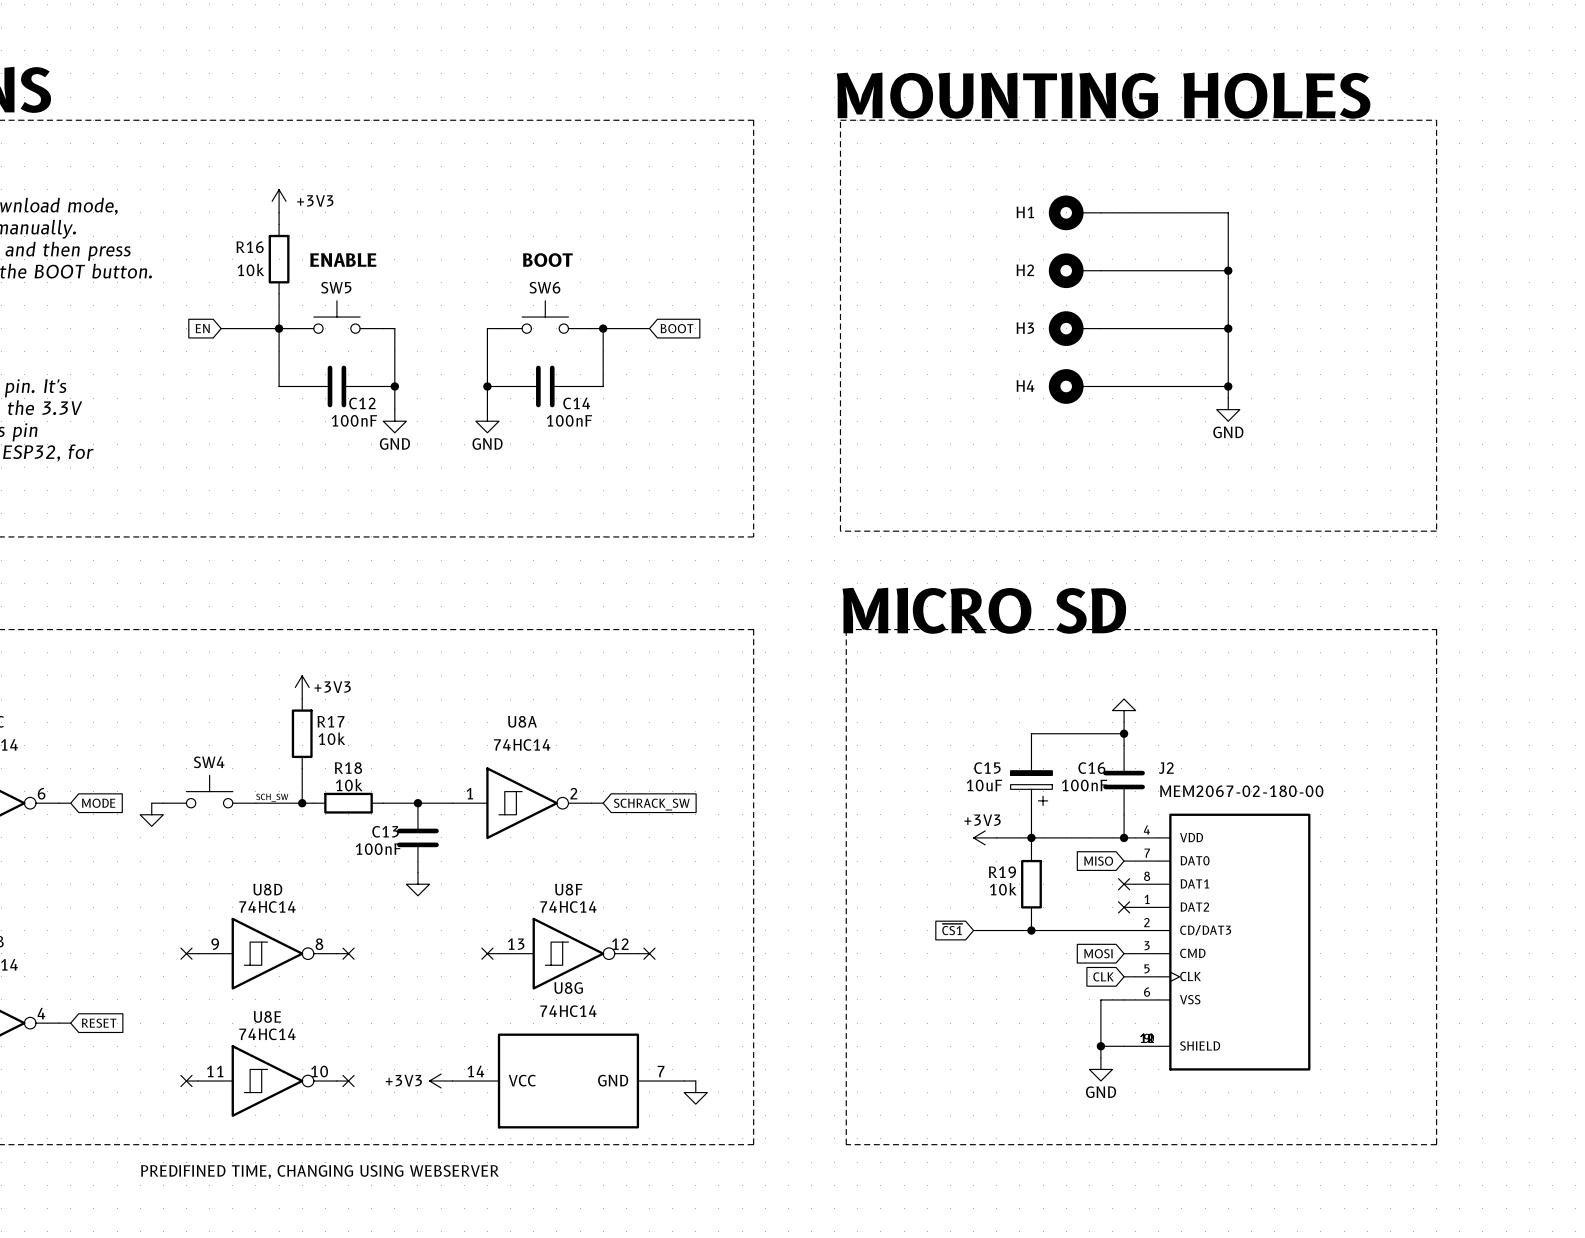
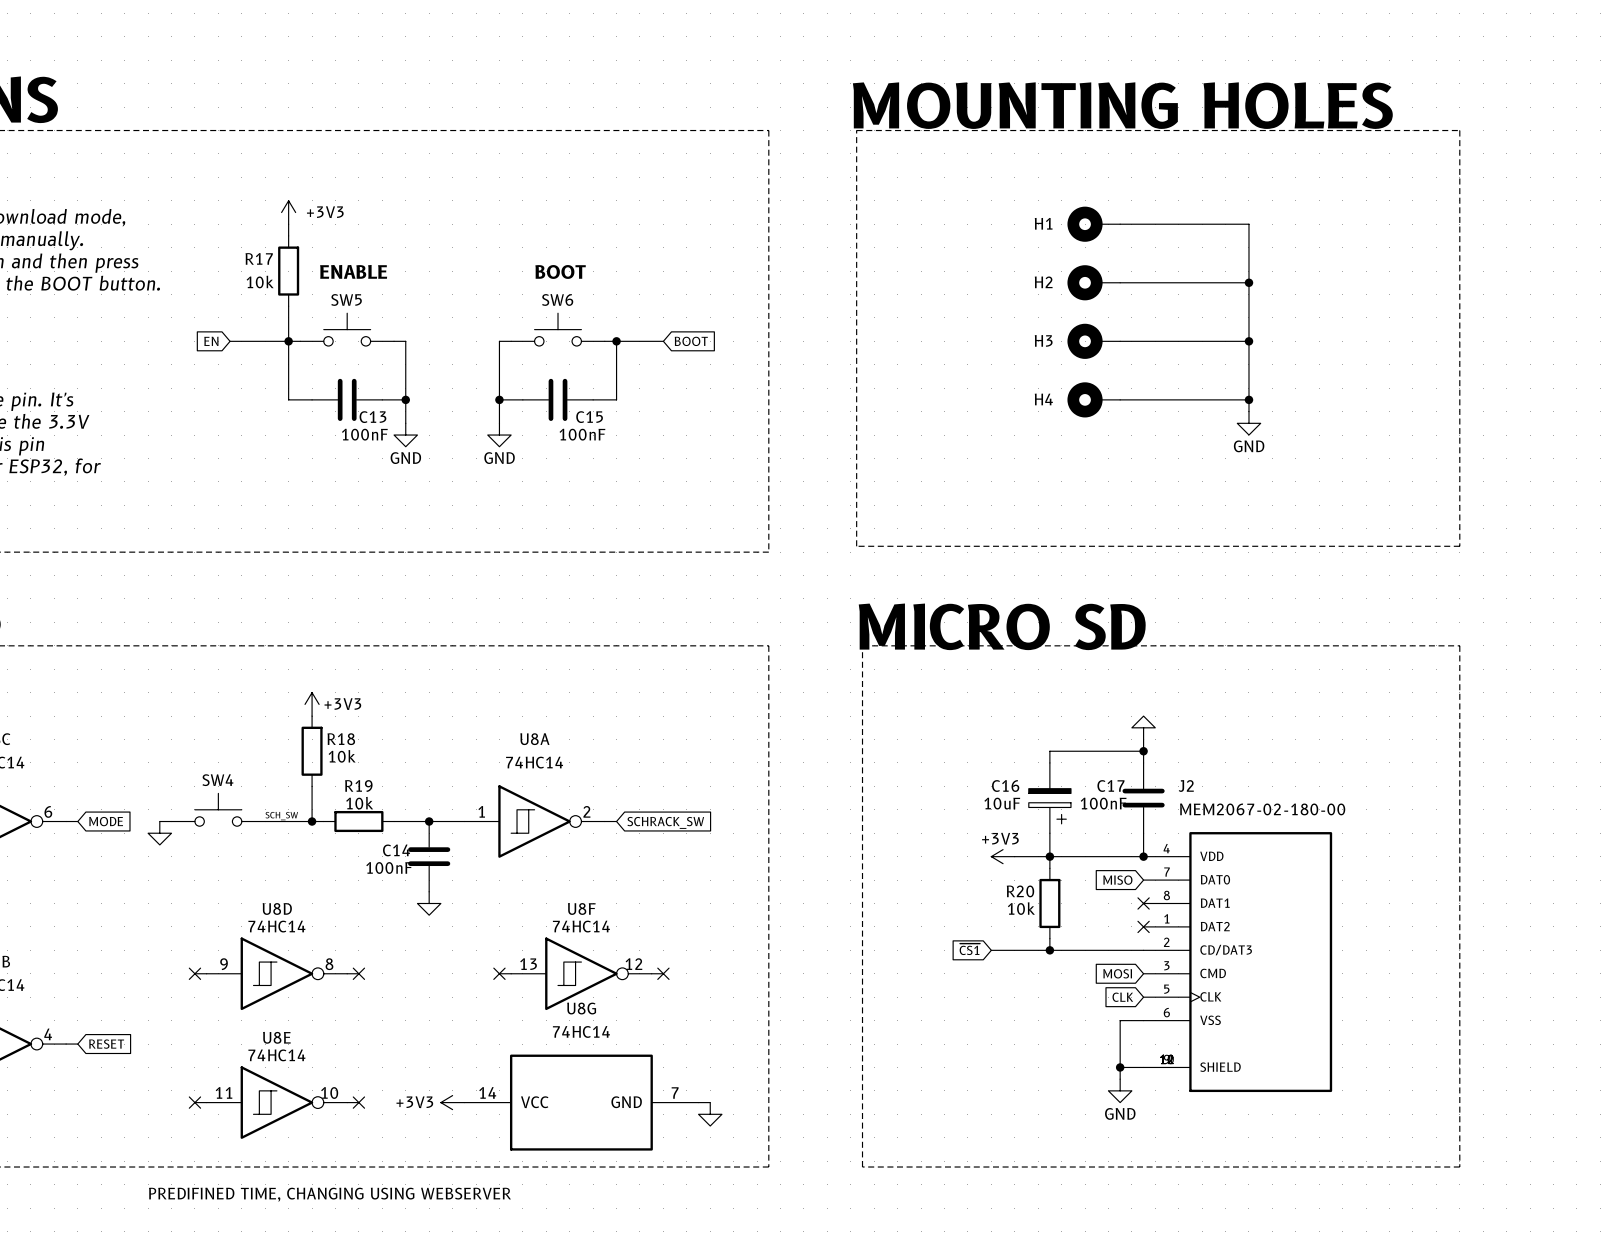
R16 name: R16 (250, 247) -> R17 (259, 258)
C12 name: C12 (362, 403) -> C13 (372, 417)
C14 name: C14 (576, 403) -> C15 (589, 417)
R17 name: R17 (330, 721) -> R18 (341, 739)
R18 name: R18 (348, 768) -> R19 (358, 786)
C15 name: C15 (987, 768) -> C16 (1005, 786)
C16 name: C16 (1091, 768) -> C17 (1110, 786)
C13 name: C13 (385, 831) -> C14 (396, 850)
R19 name: R19 (1002, 872) -> R20 (1020, 891)

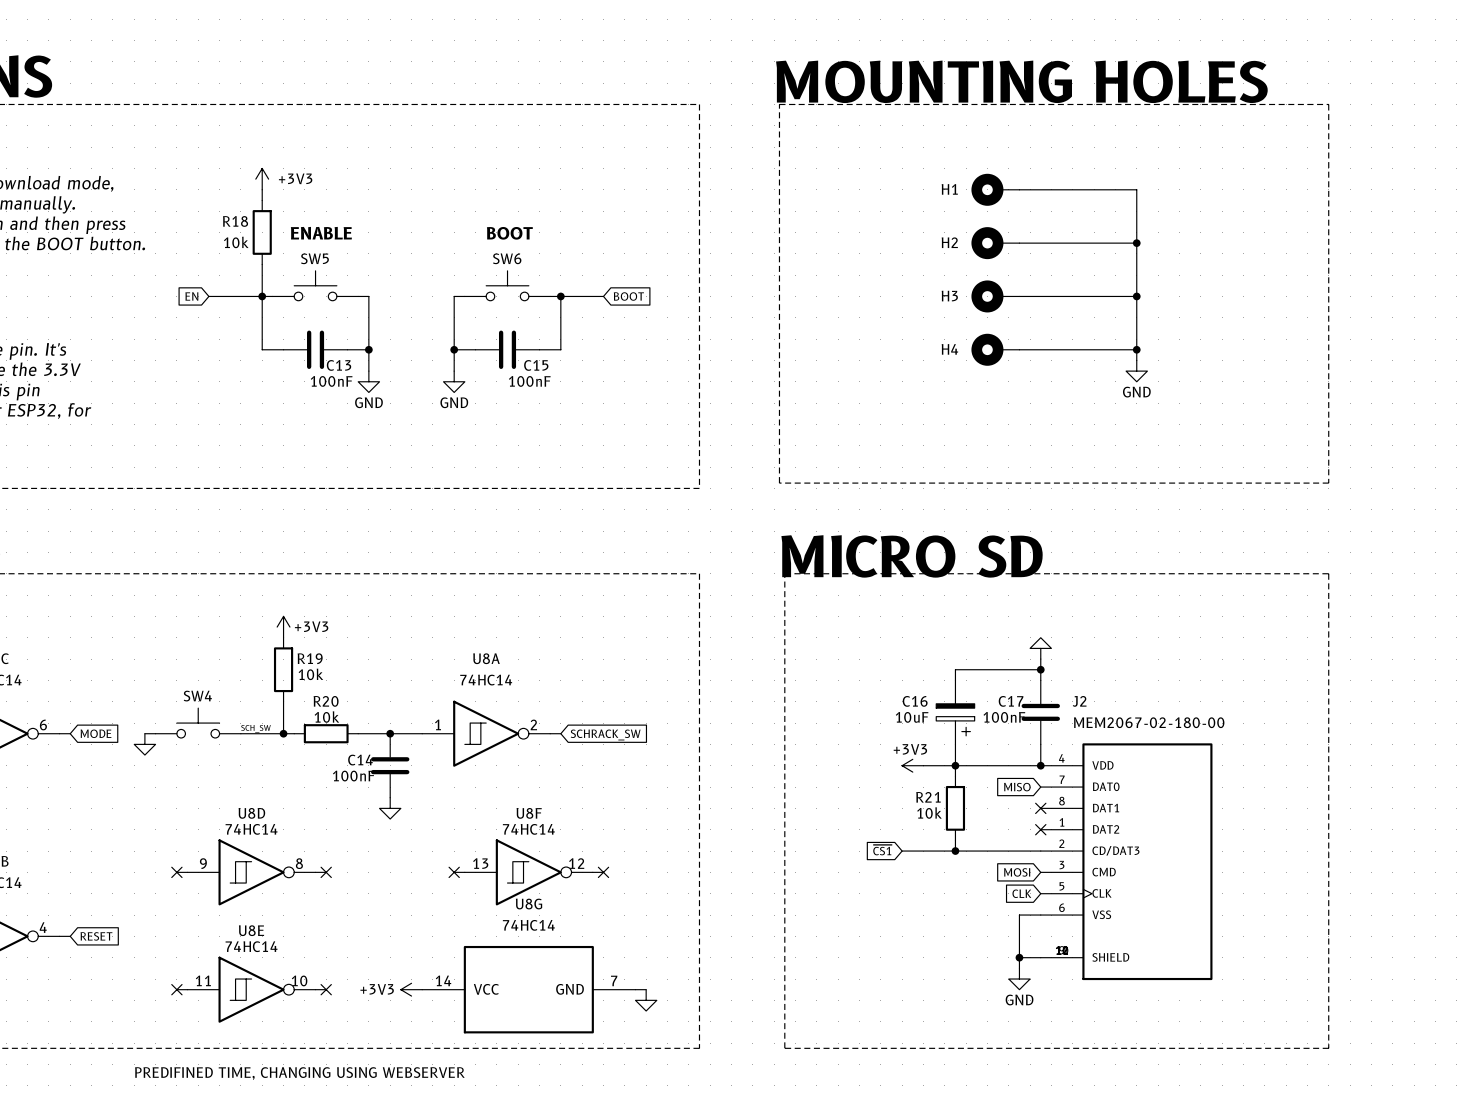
R17 name: R17 (259, 258) -> R18 (235, 221)
R18 name: R18 (341, 739) -> R19 (310, 658)
R19 name: R19 (358, 786) -> R20 (326, 701)
R20 name: R20 (1020, 891) -> R21 (928, 797)

